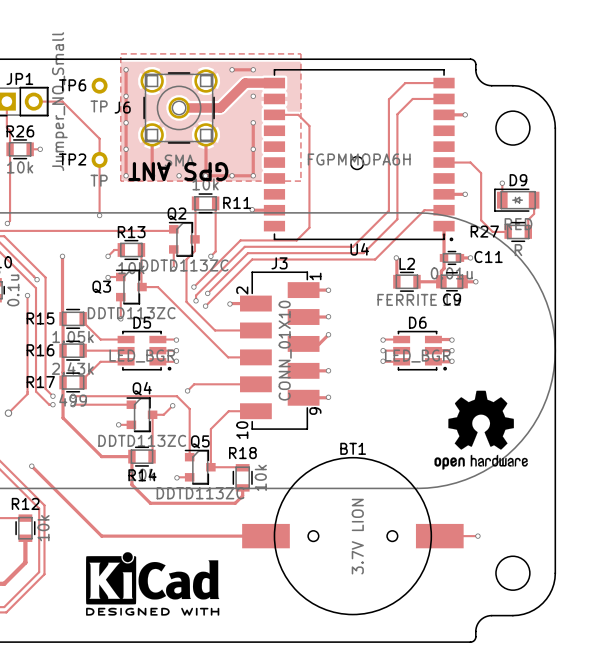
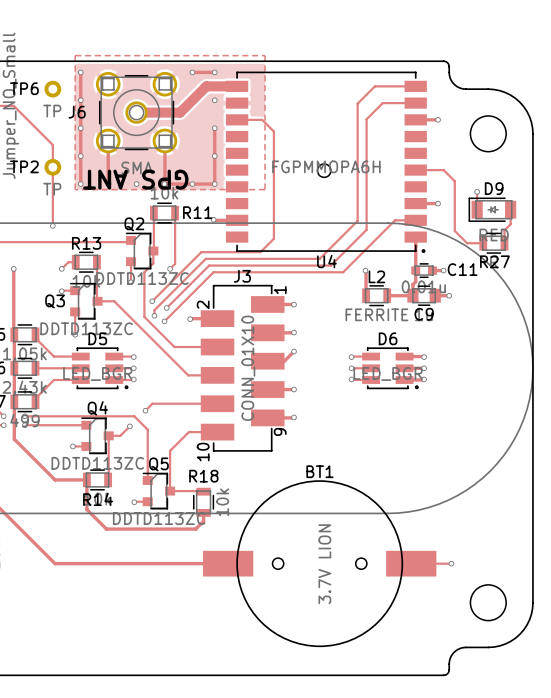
R27 name position: R27 (484, 231) -> R27 (494, 261)
drawing: [434, 390, 528, 470] -> none
drawing: [86, 552, 220, 616] -> none

